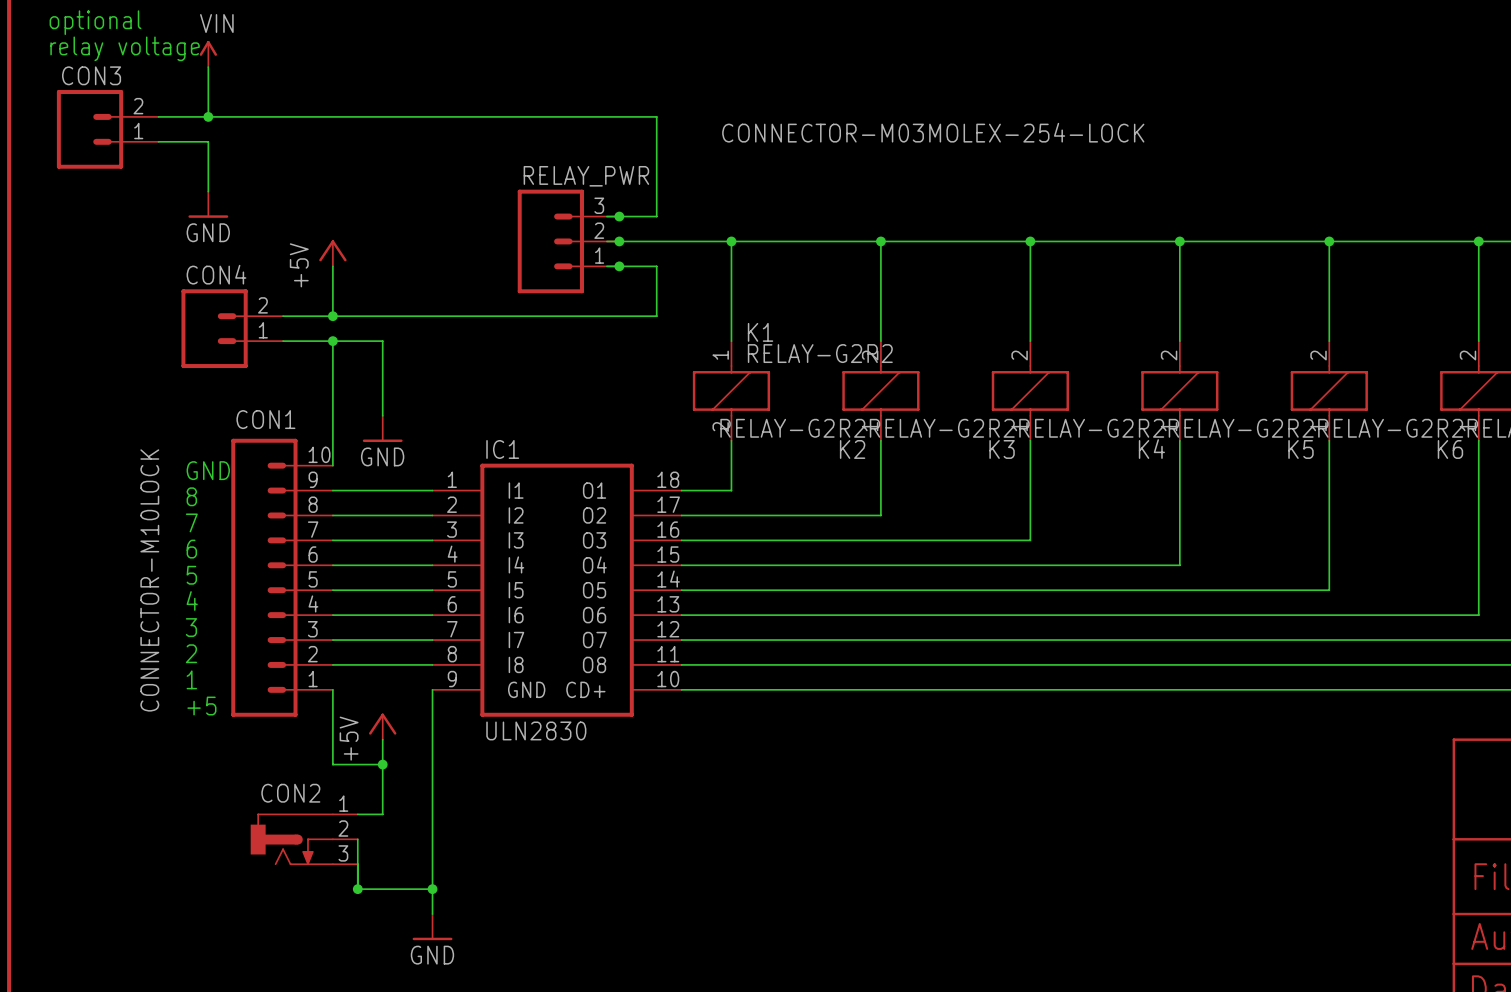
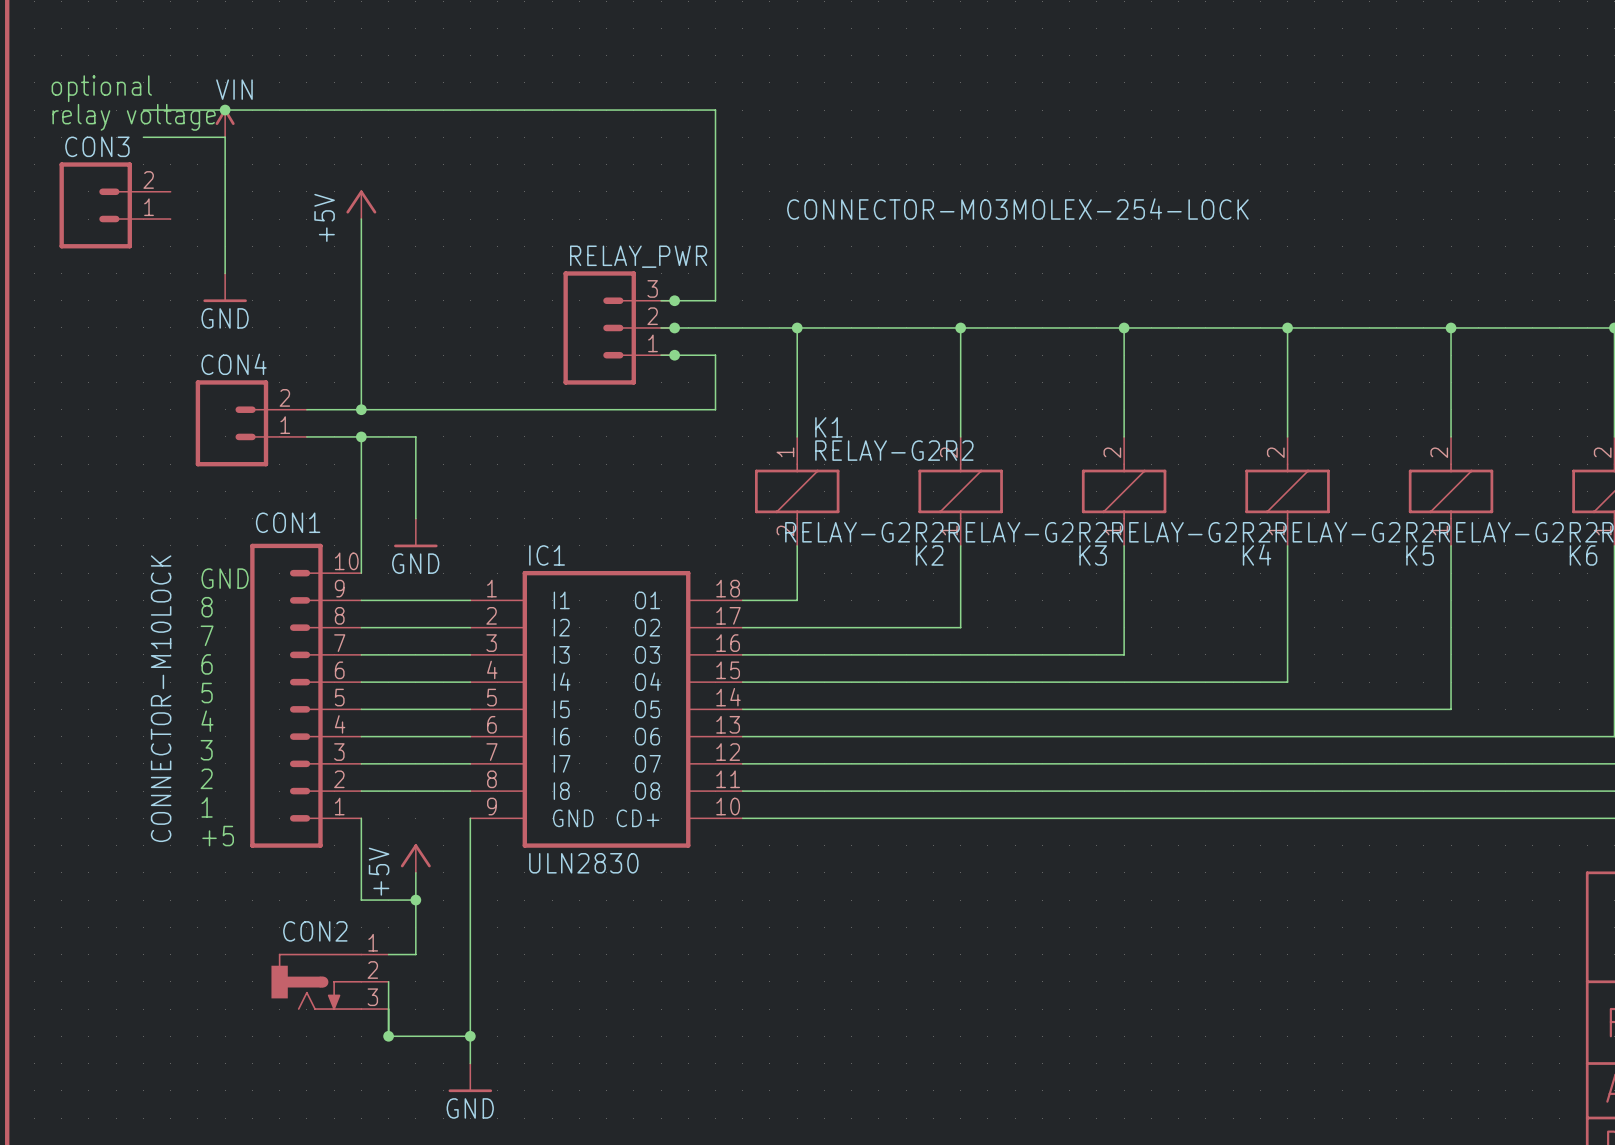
junction: none -> (225, 110)
wire: none -> (143, 137) (225, 137)
wire: (158, 116) (656, 116) -> (143, 110) (715, 110) (715, 191)
junction: (208, 116) -> none
wire: (158, 141) (208, 141) -> (225, 191) (225, 219)
wire: none -> (361, 219) (361, 355)
power symbol position: +5V (332, 253) -> +5V (361, 204)

